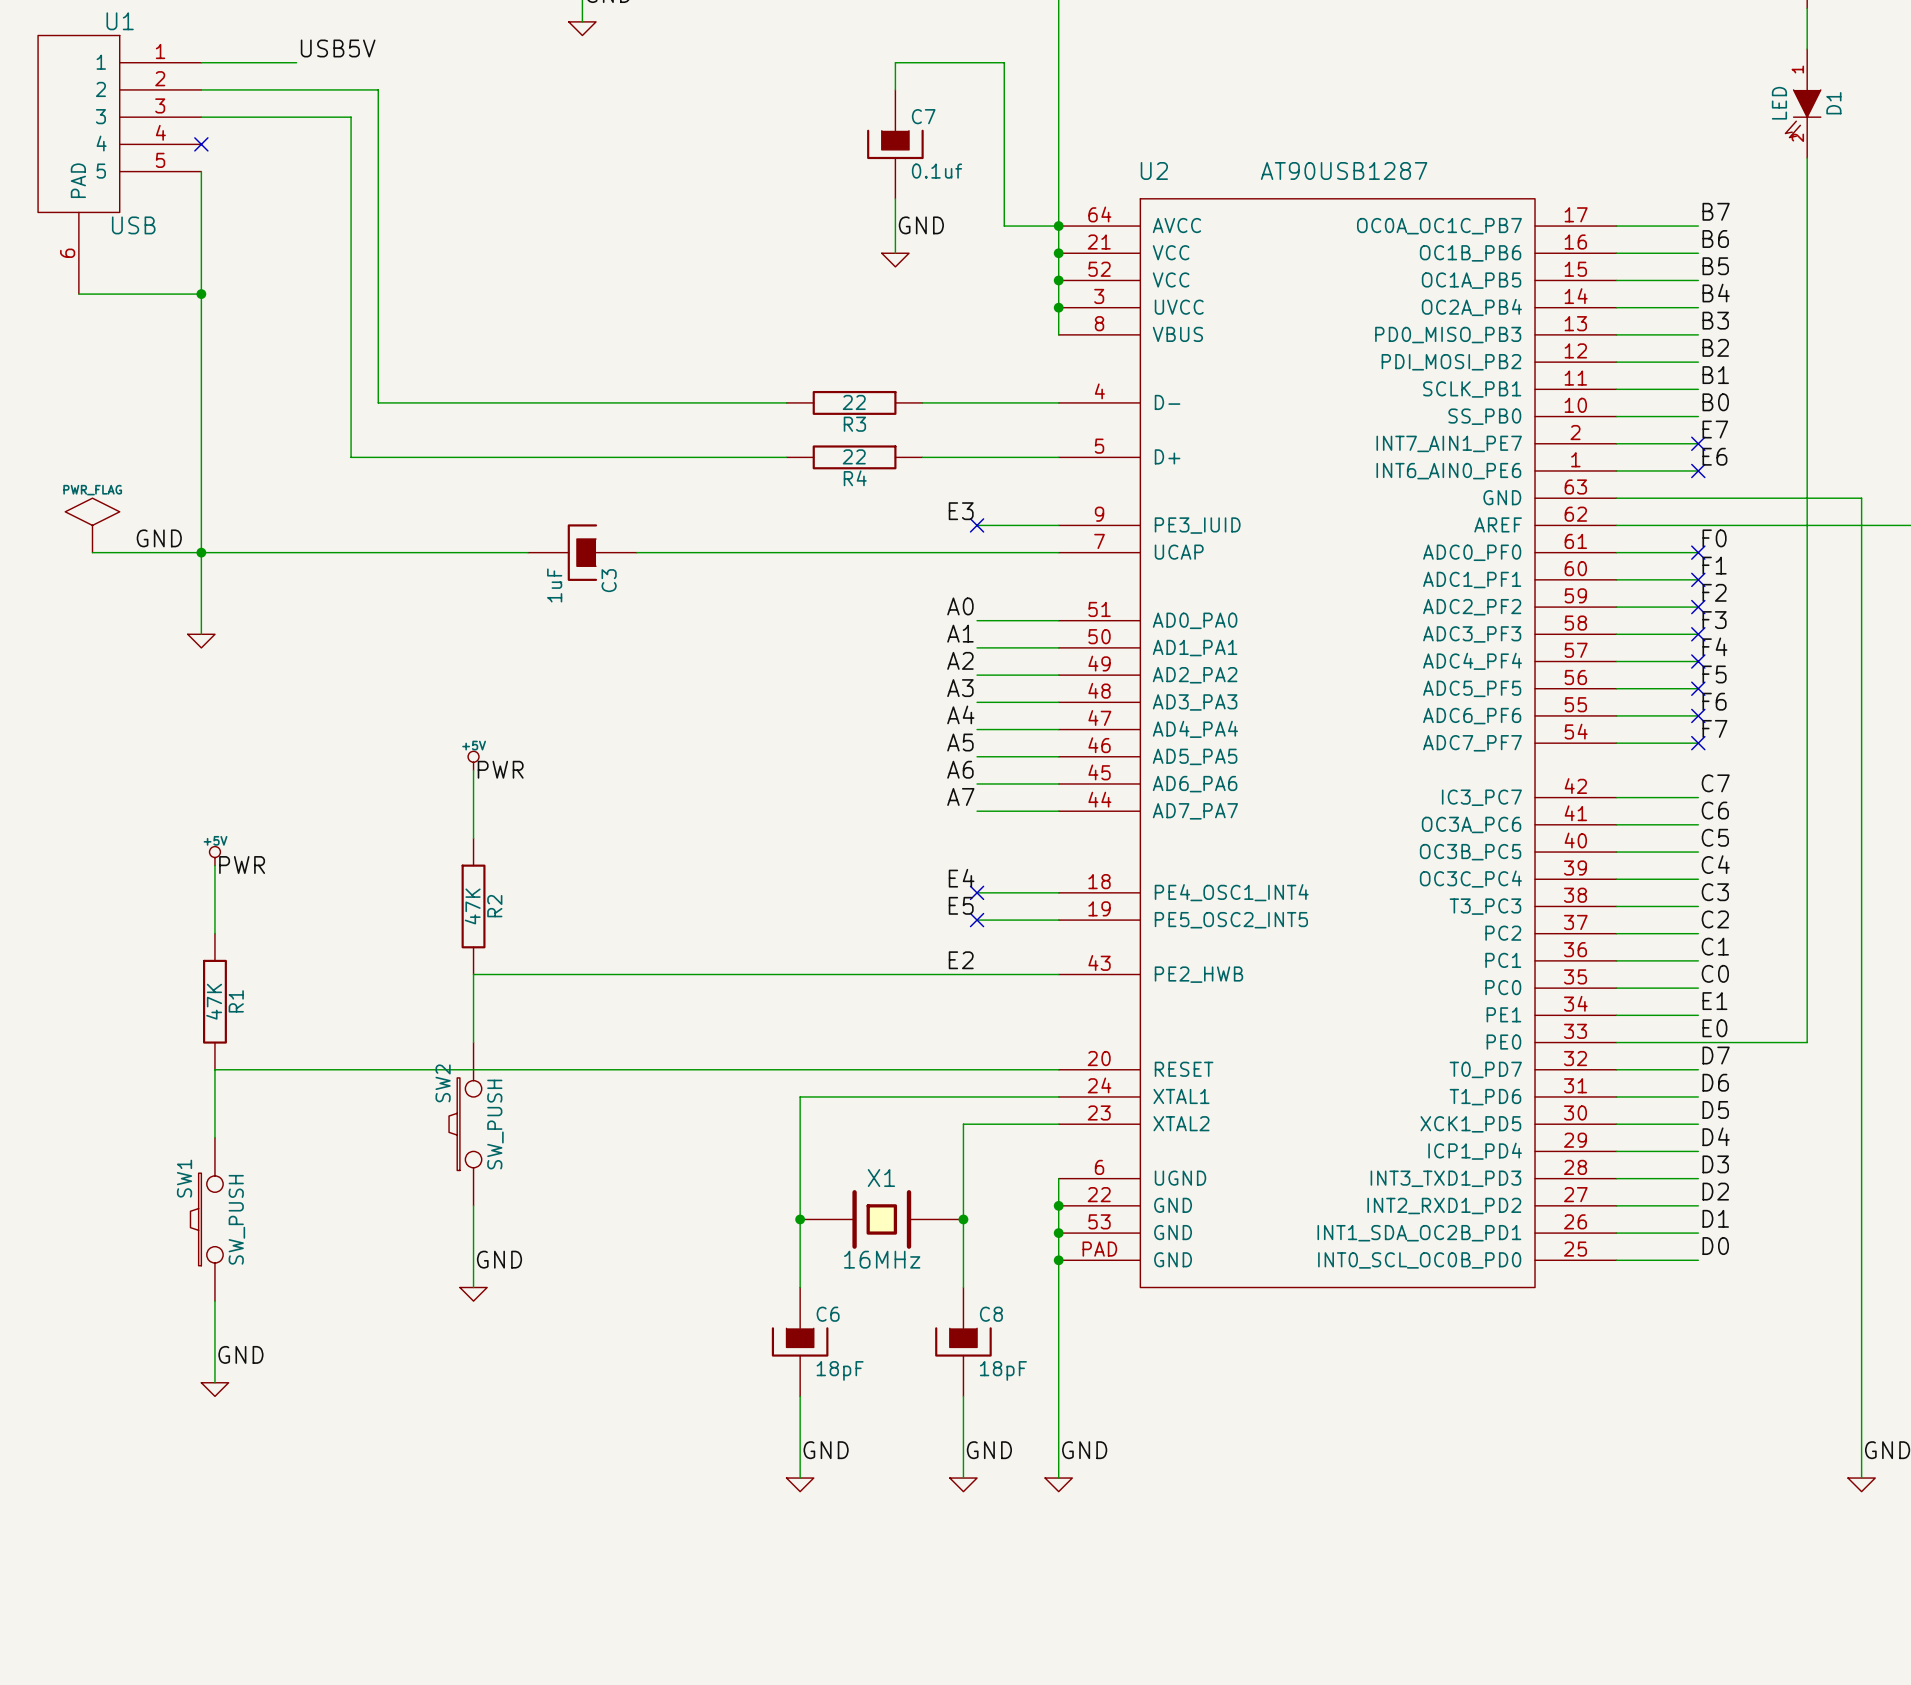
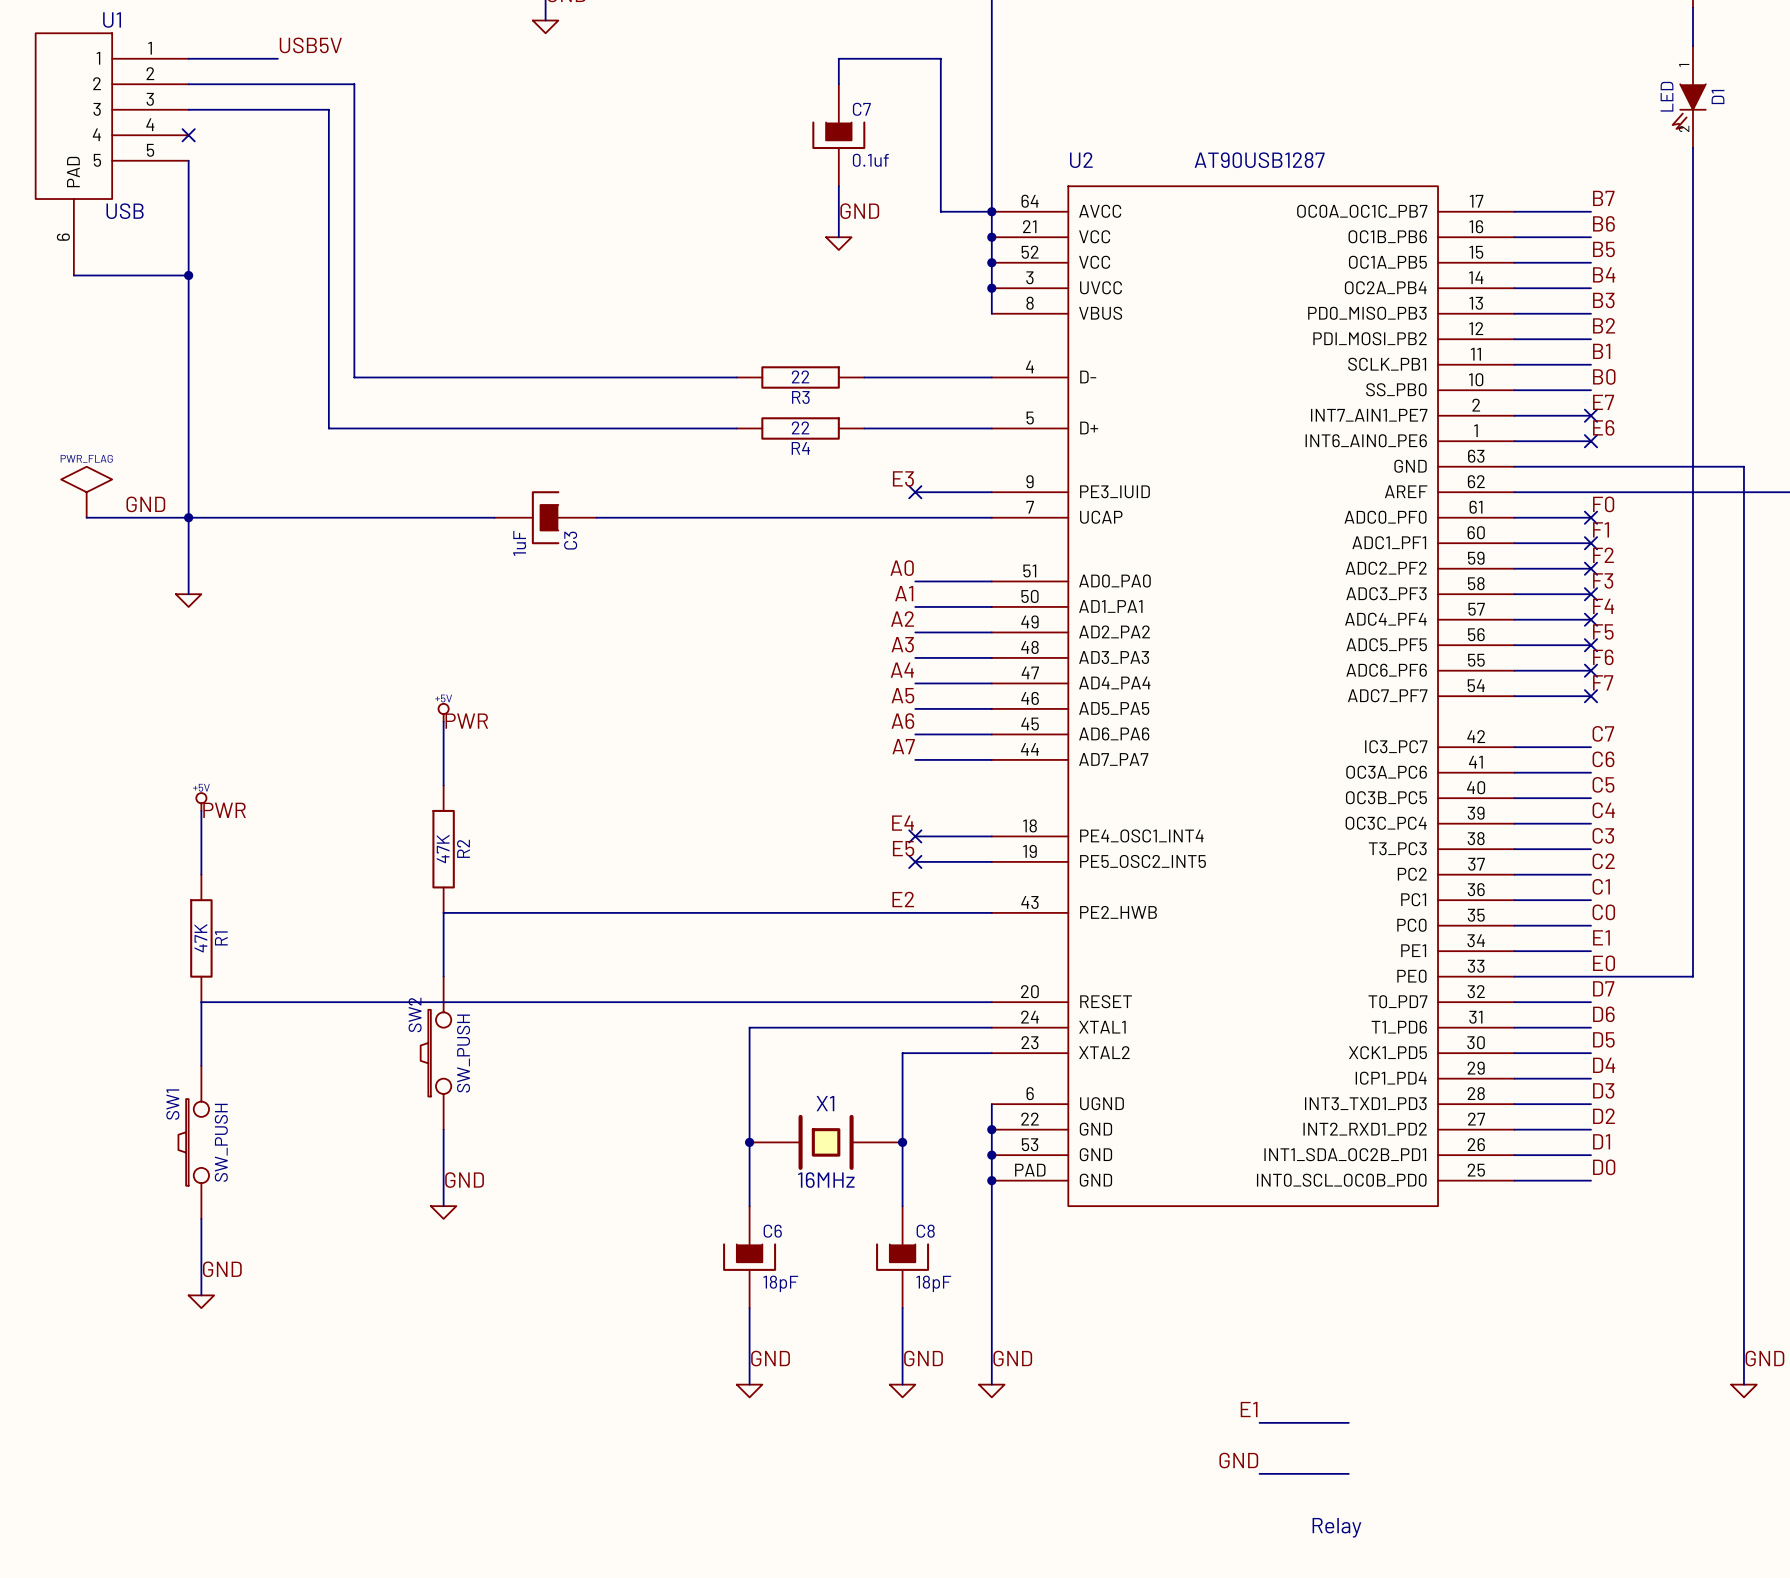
label: none -> E1 (1249, 1409)
wire: none -> (1259, 1422) (1348, 1422)
label: none -> GND (1238, 1460)
wire: none -> (1259, 1473) (1348, 1473)
text: none -> Relay (1336, 1527)

